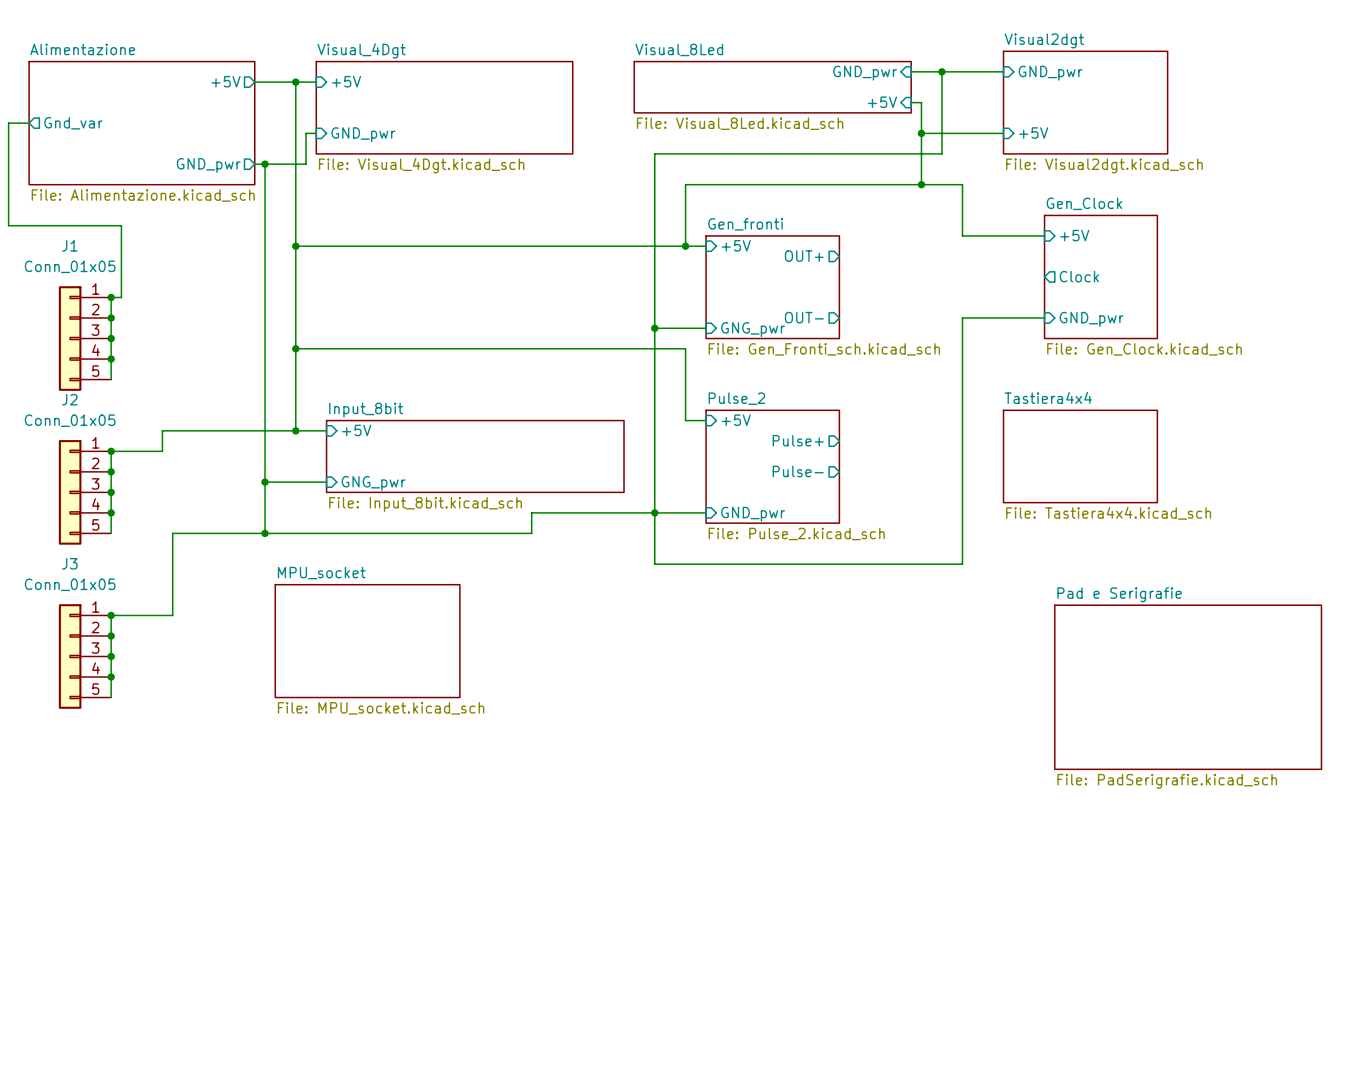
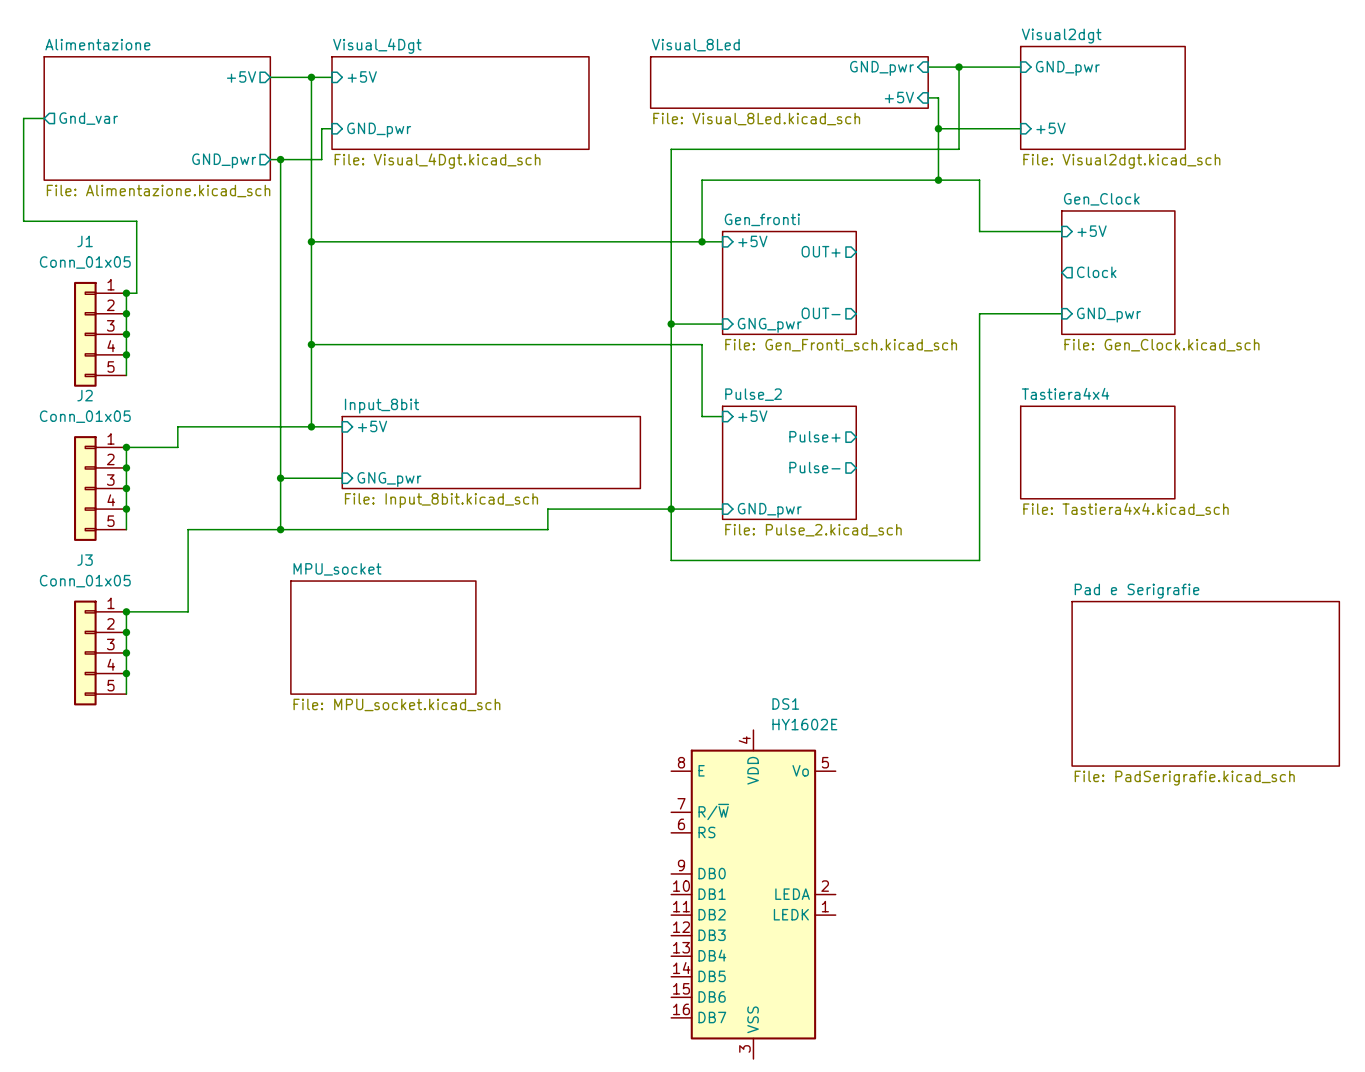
DS1: none -> HY1602E (753, 894)

